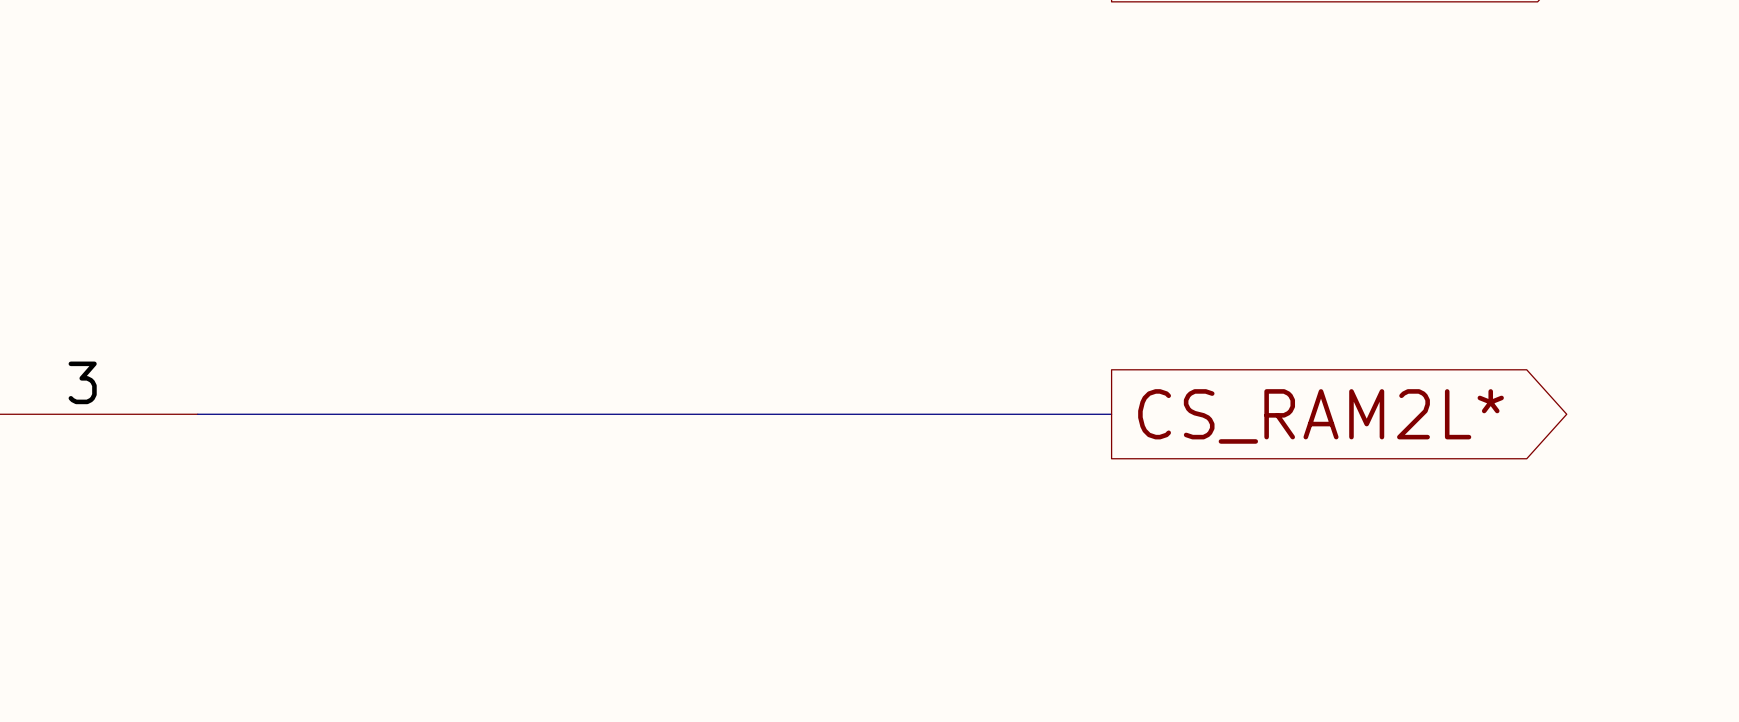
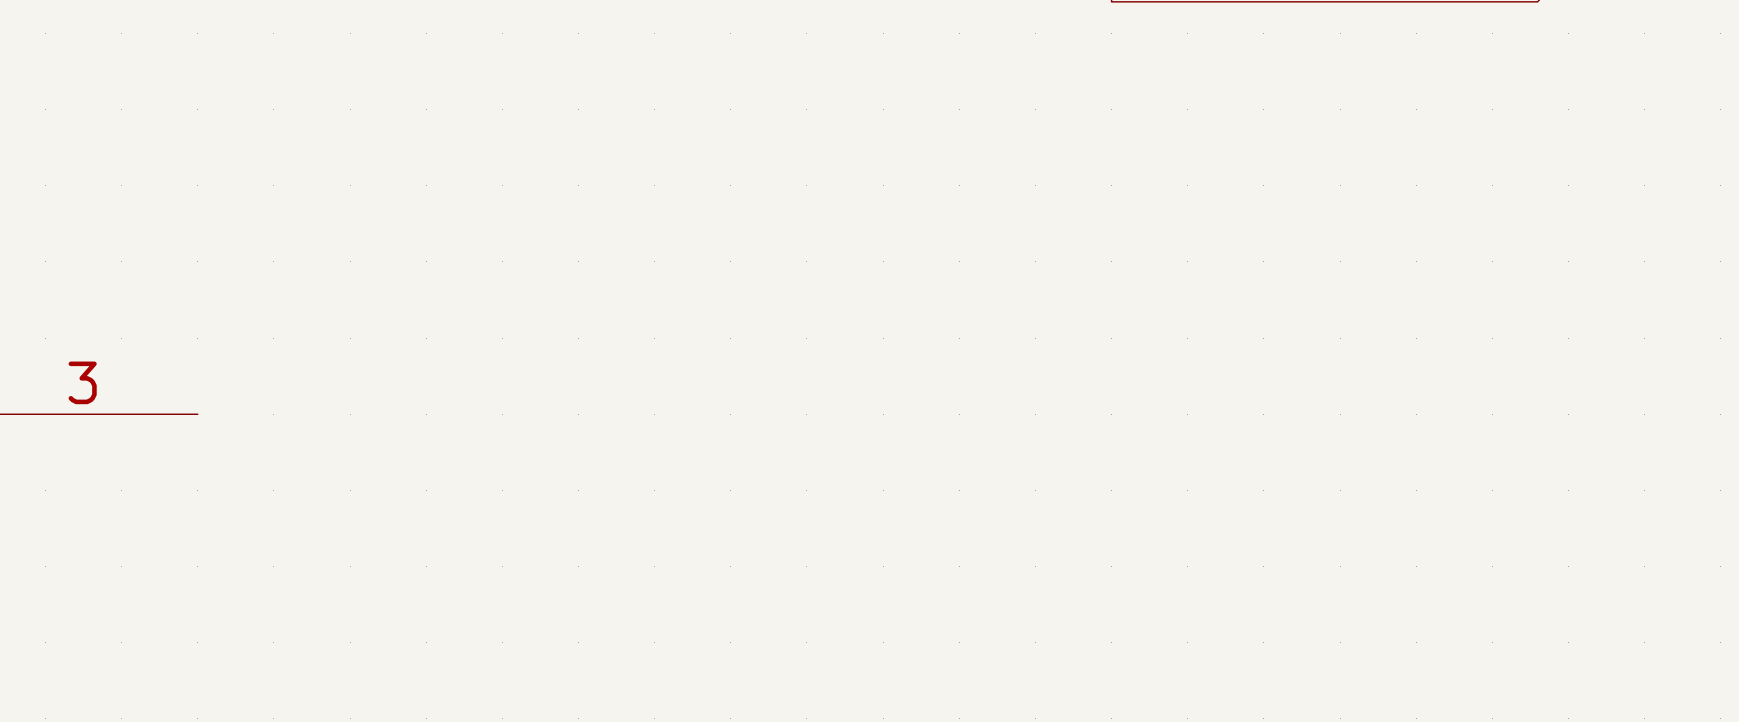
wire: (197, 414) (1111, 414) -> none
global label: CS_RAM2L* (1321, 416) -> none

